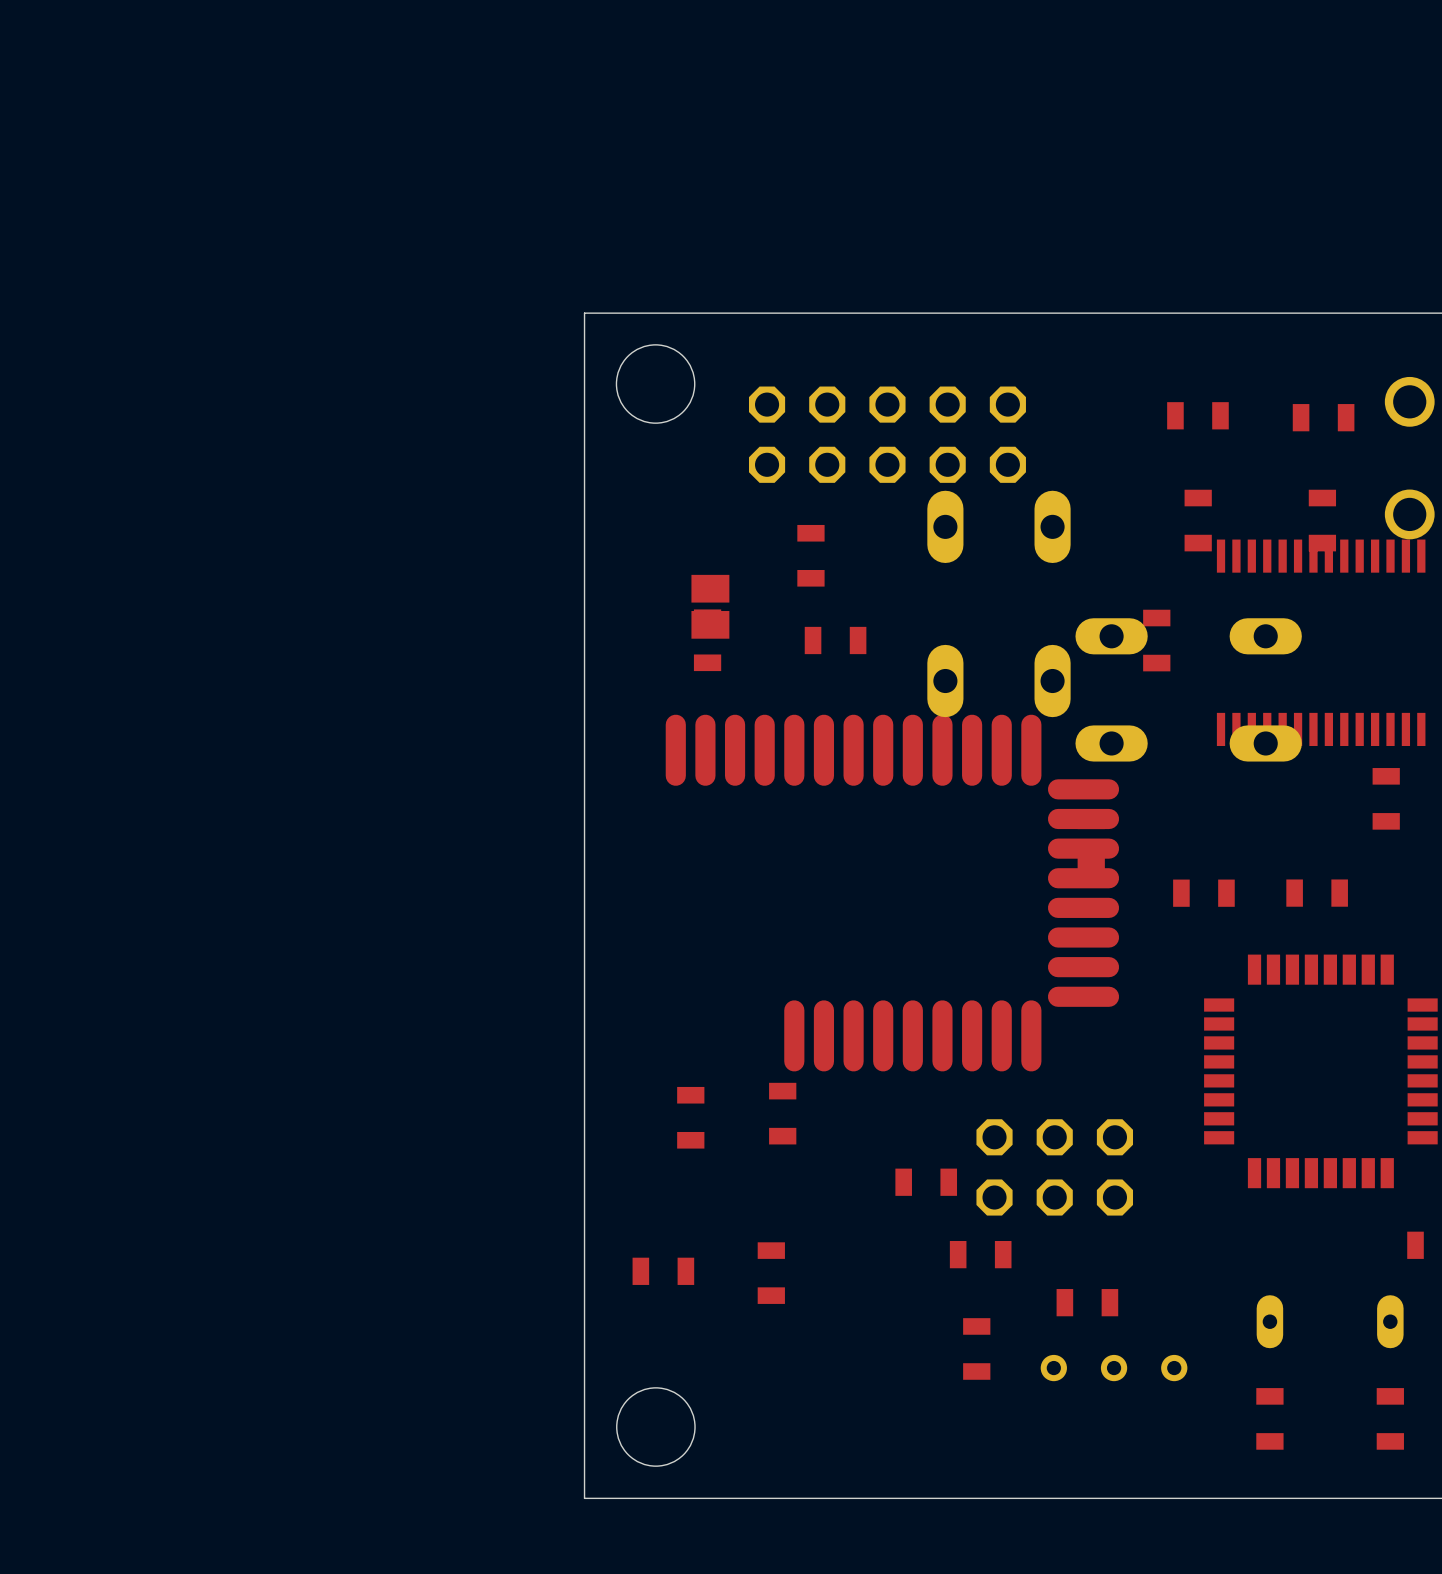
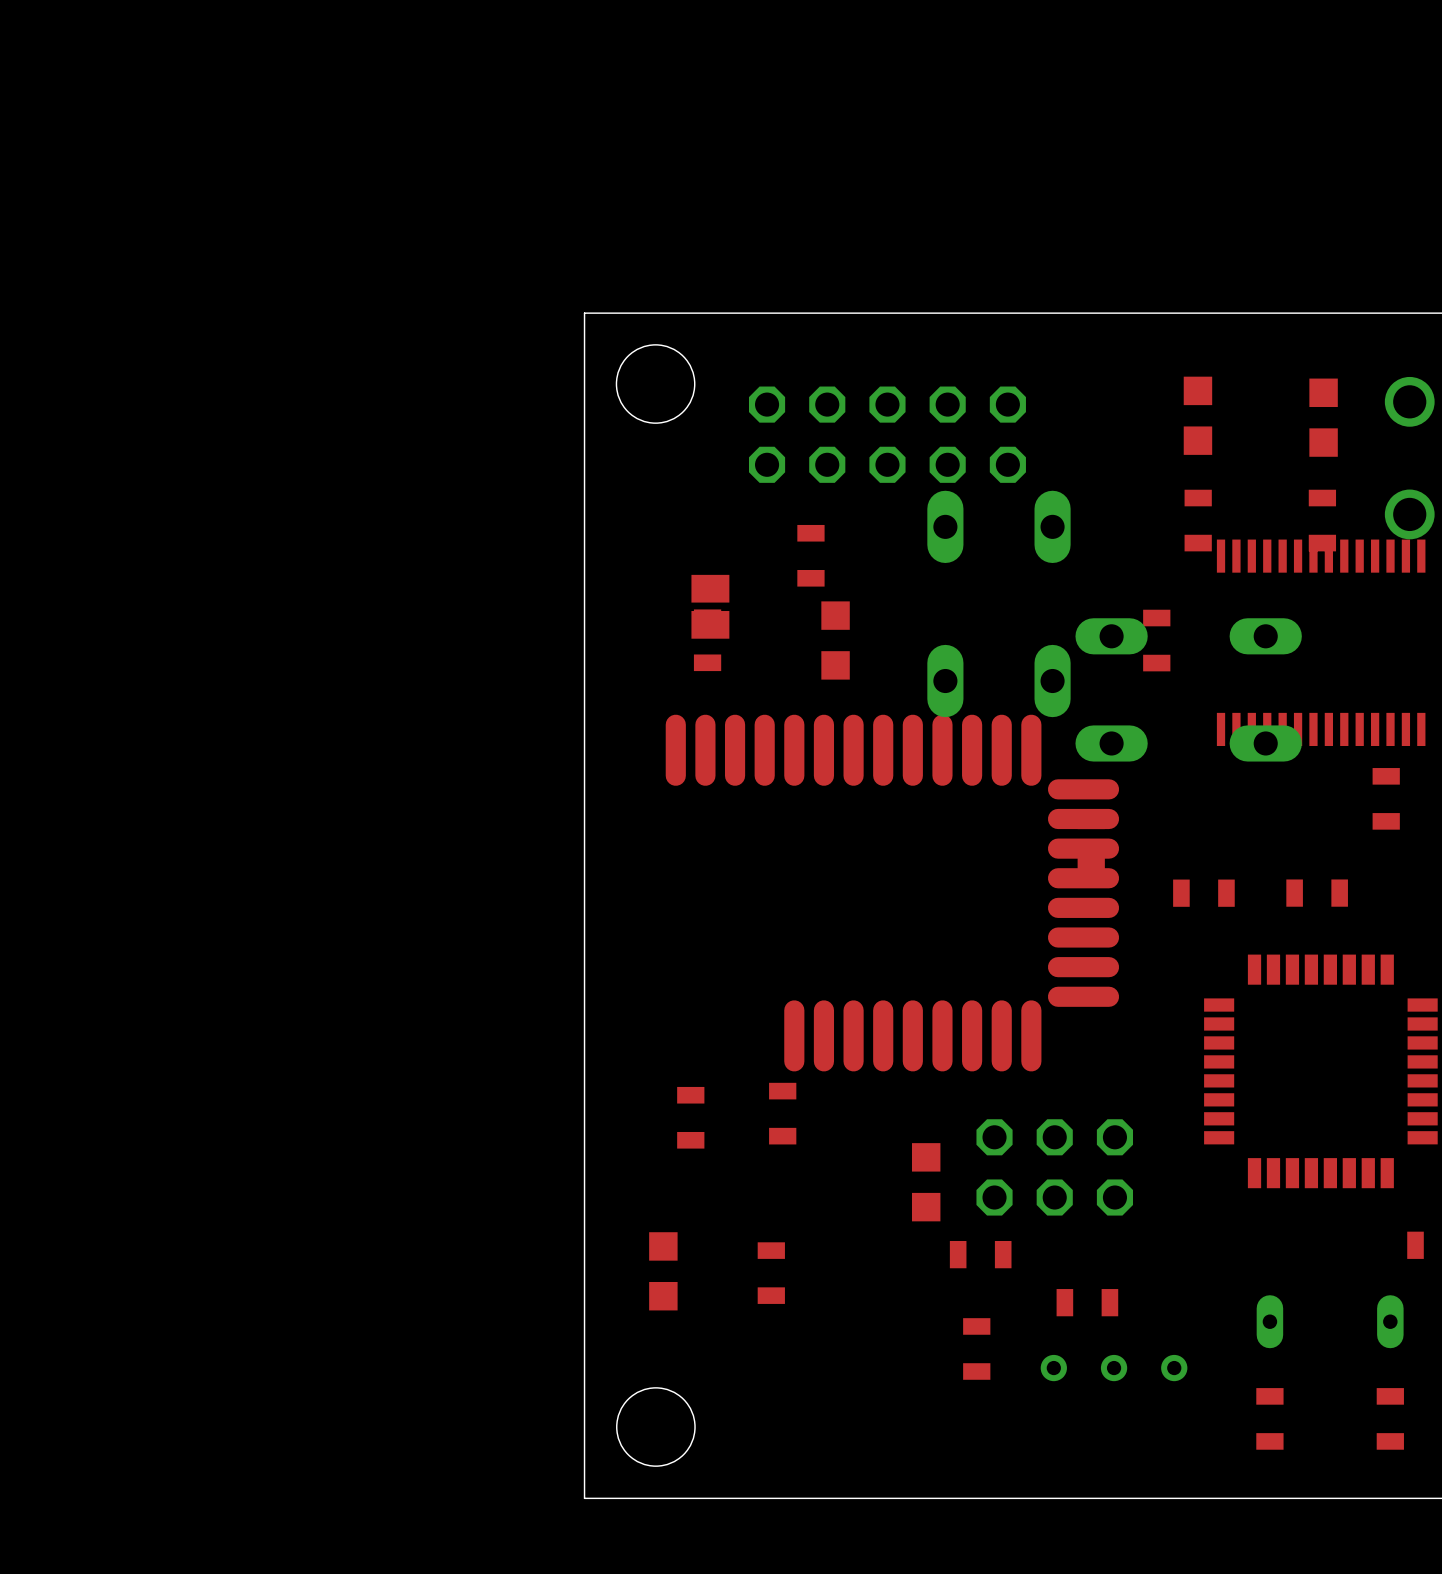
part footprint: [1167, 402, 1229, 430] -> [1183, 376, 1213, 455]
part footprint: [1292, 404, 1355, 432] -> [1309, 378, 1338, 457]
part footprint: [804, 626, 867, 655] -> [821, 601, 850, 680]
part footprint: [895, 1168, 958, 1196] -> [911, 1143, 941, 1222]
part footprint: [632, 1257, 695, 1285] -> [649, 1232, 678, 1311]

